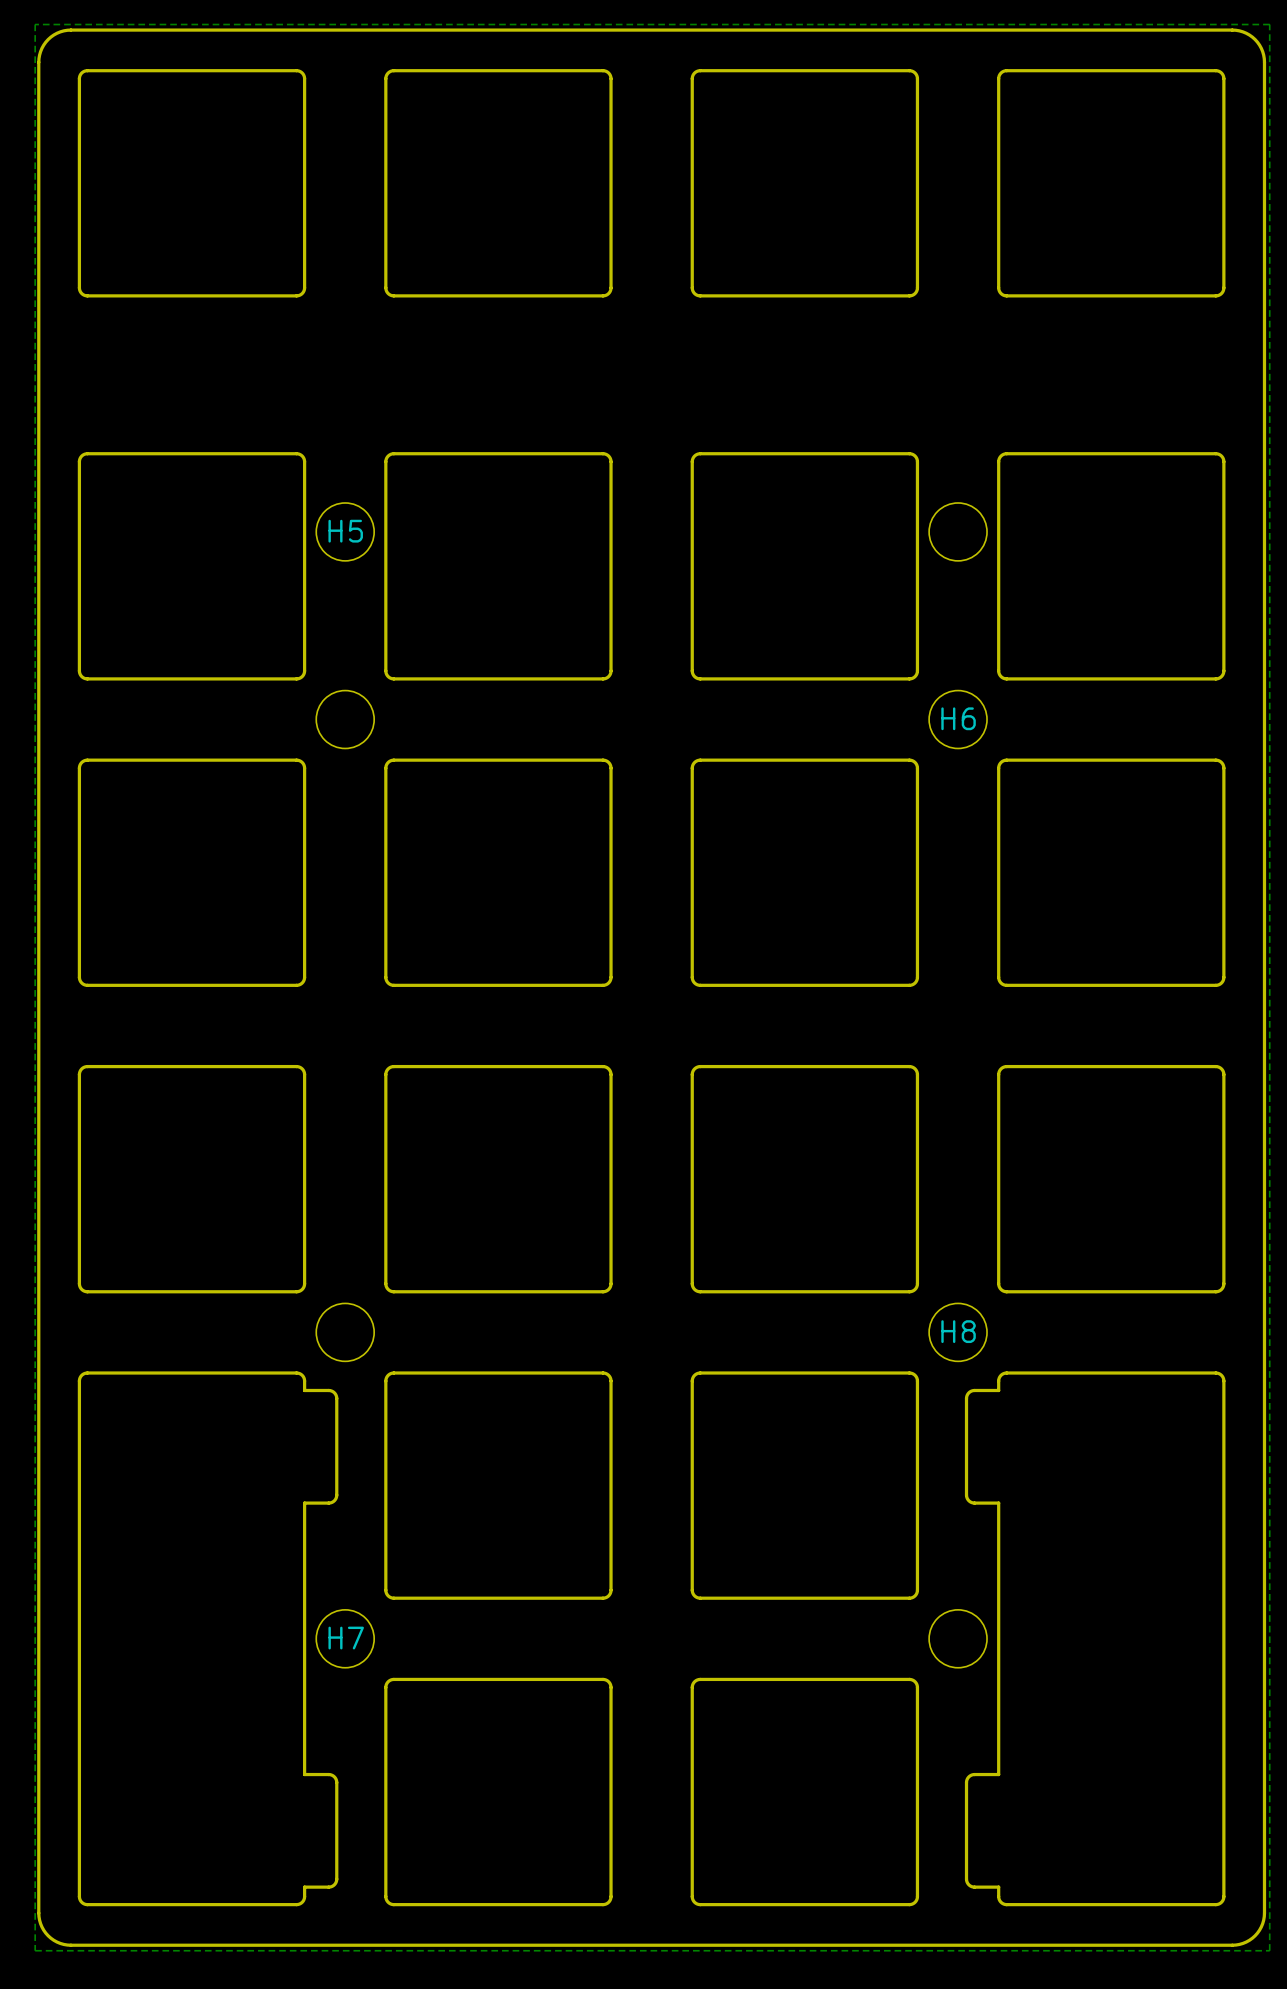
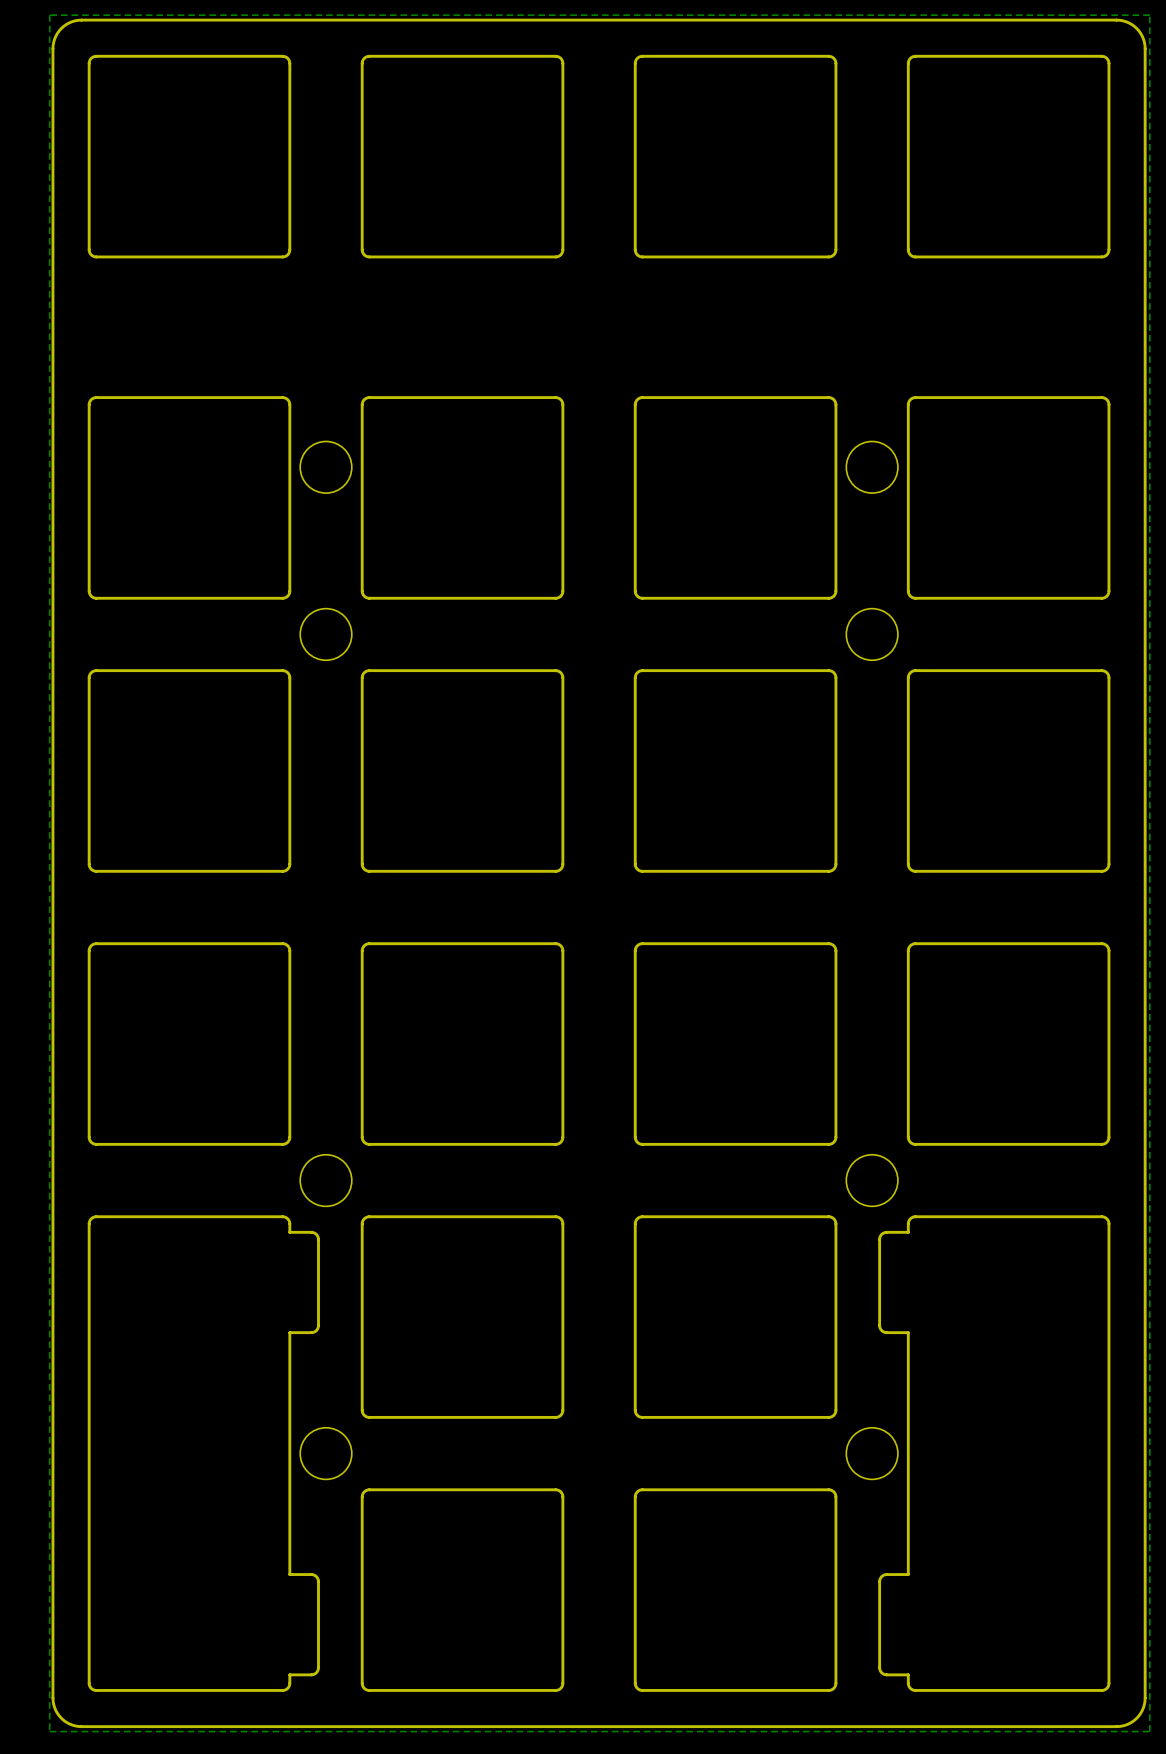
H5 name: H5 (345, 531) -> none
H6 name: H6 (958, 718) -> none
H8 name: H8 (958, 1331) -> none
H7 name: H7 (346, 1638) -> none

